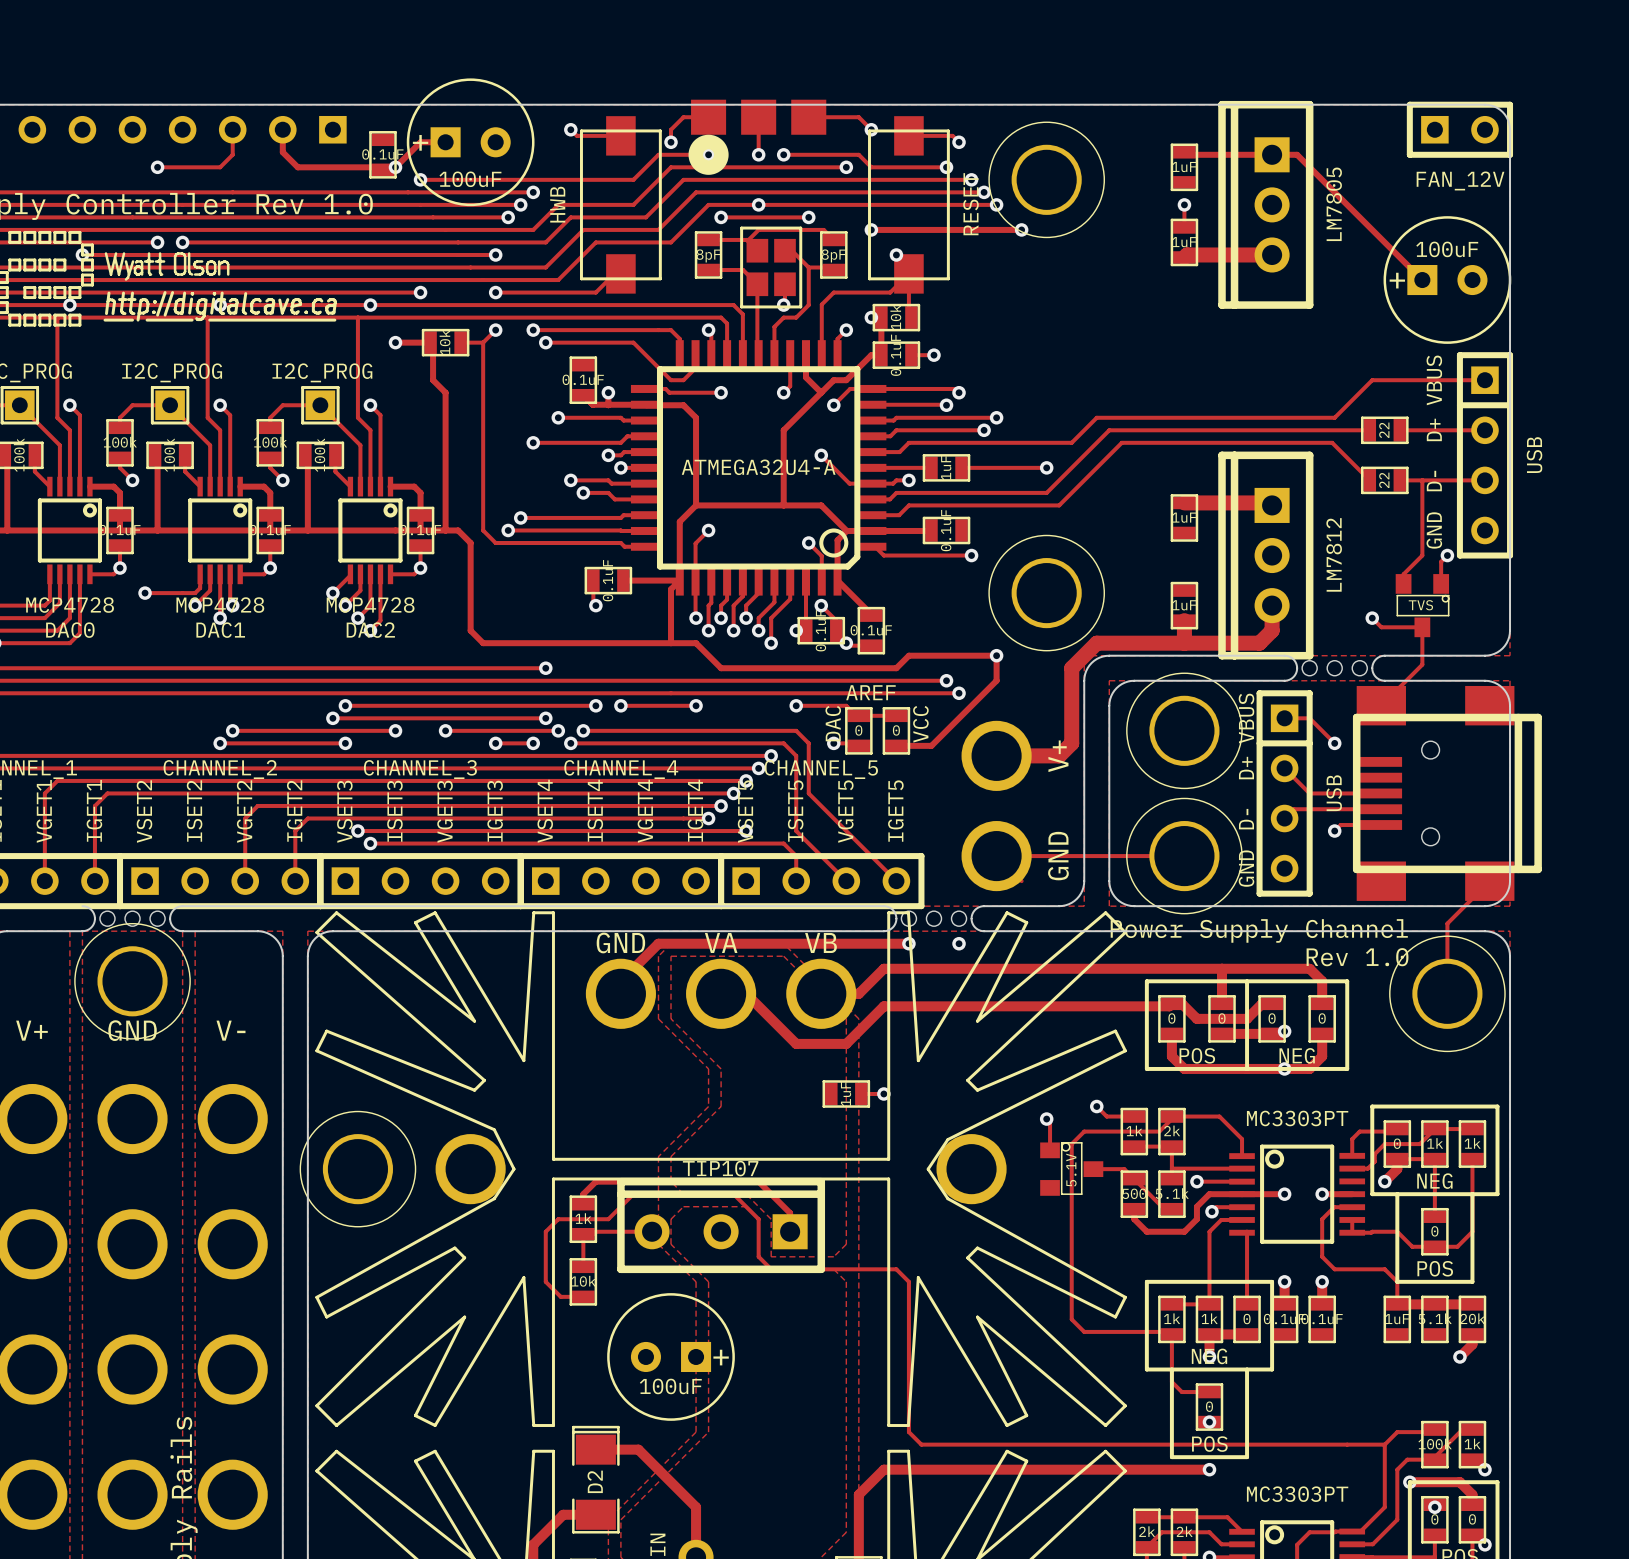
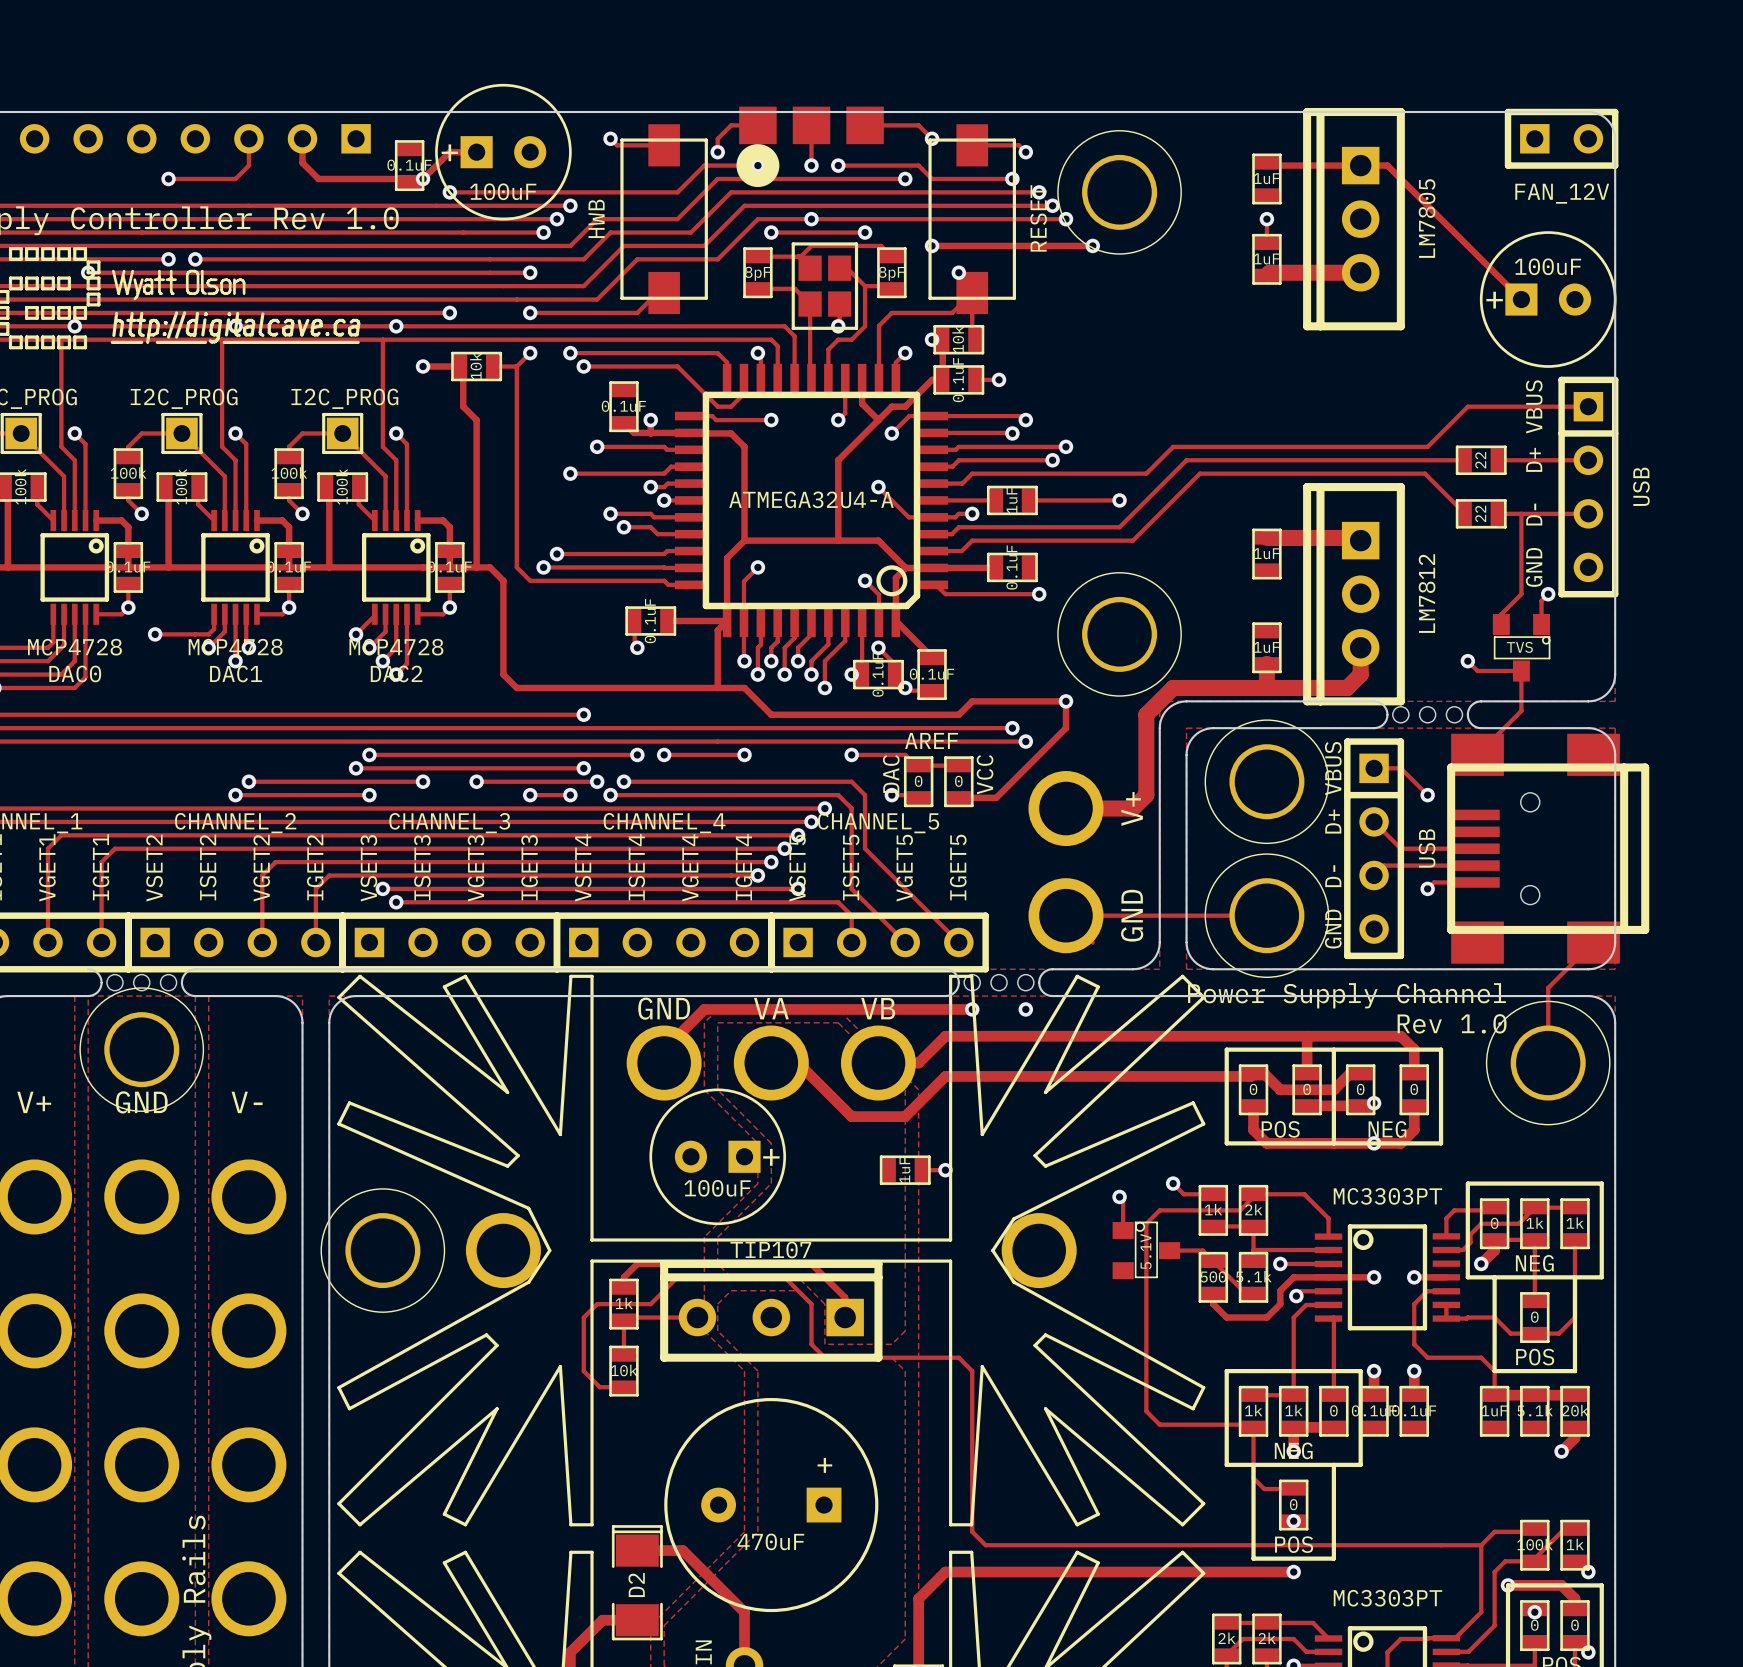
part position: (671, 1356) -> (717, 1156)
part: none -> 470uF (771, 1505)

